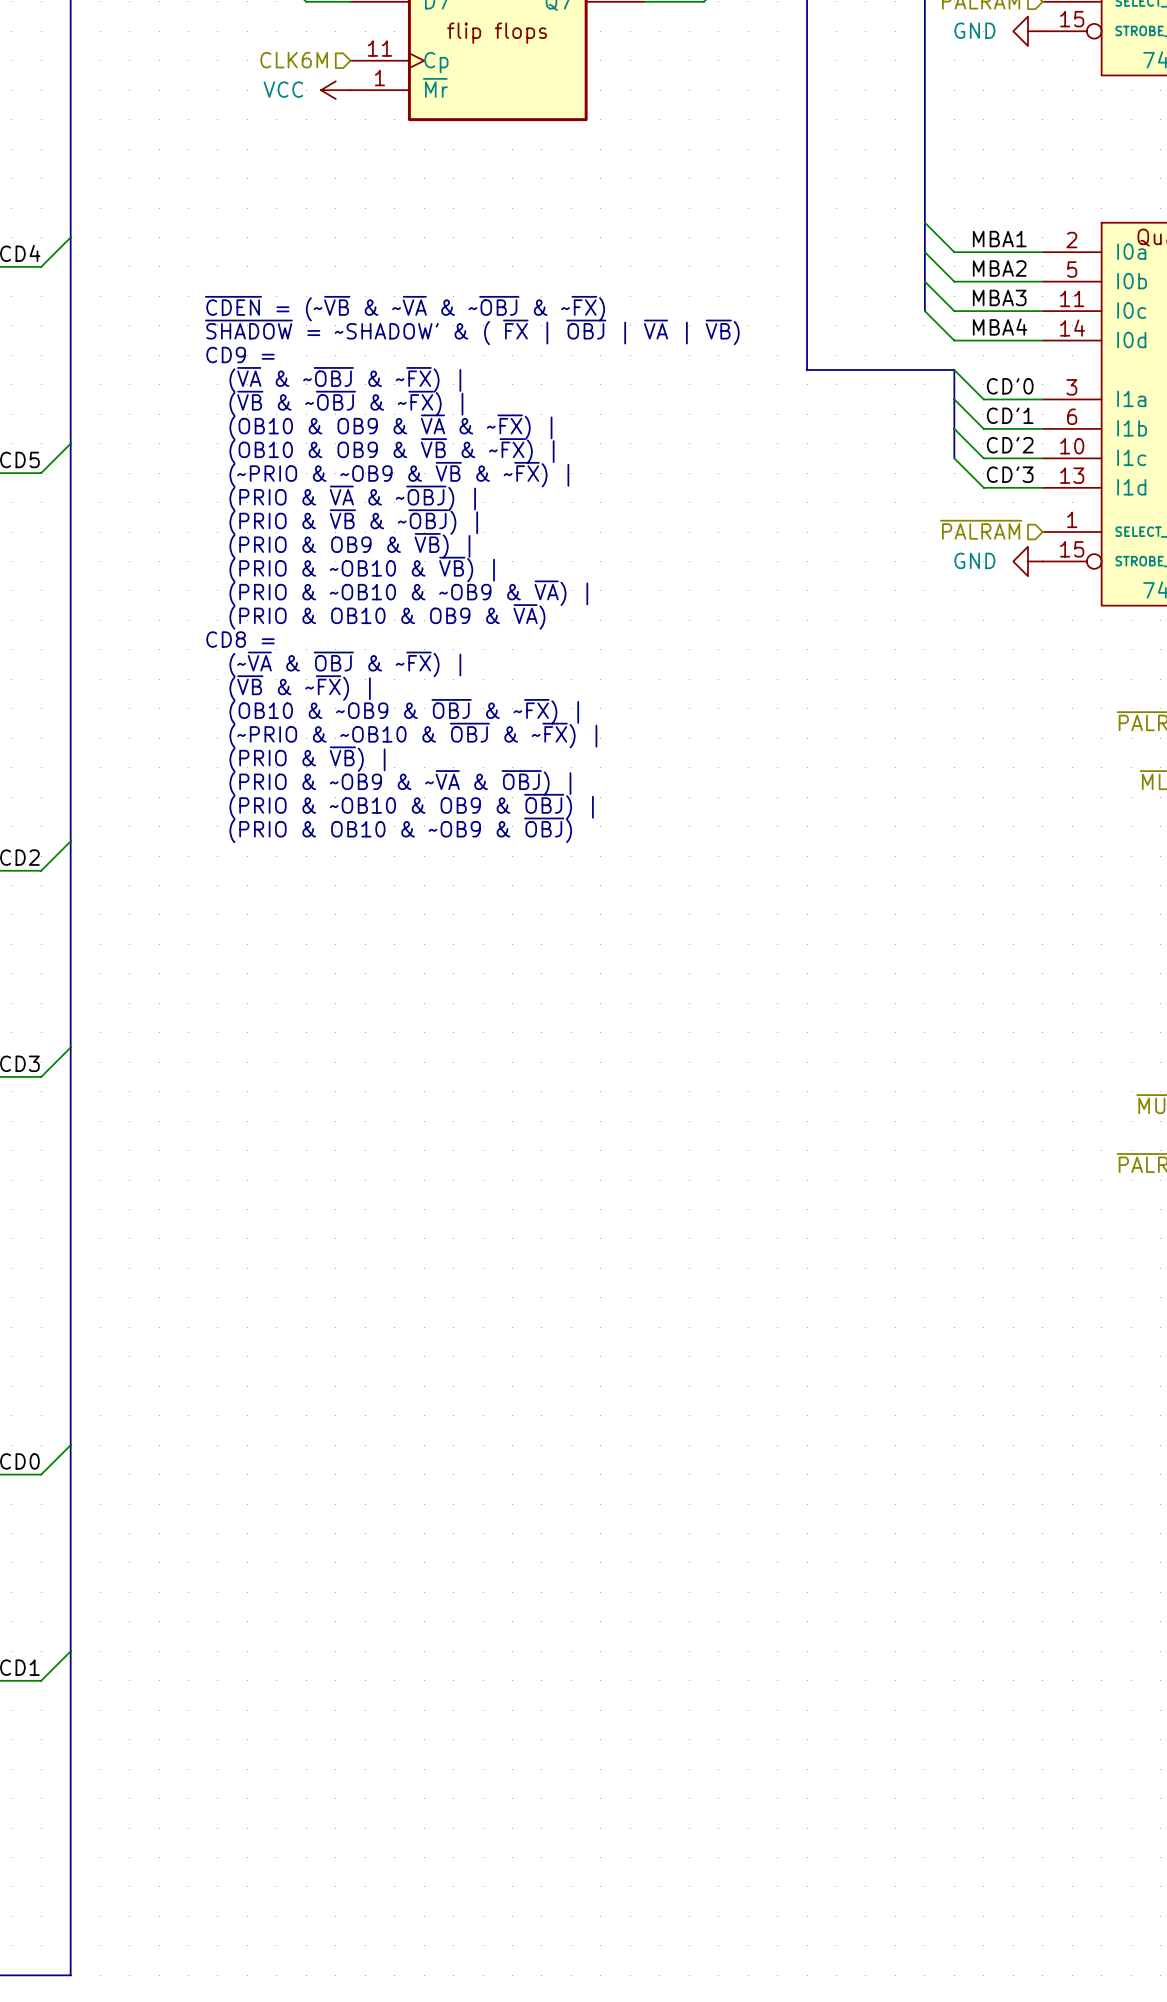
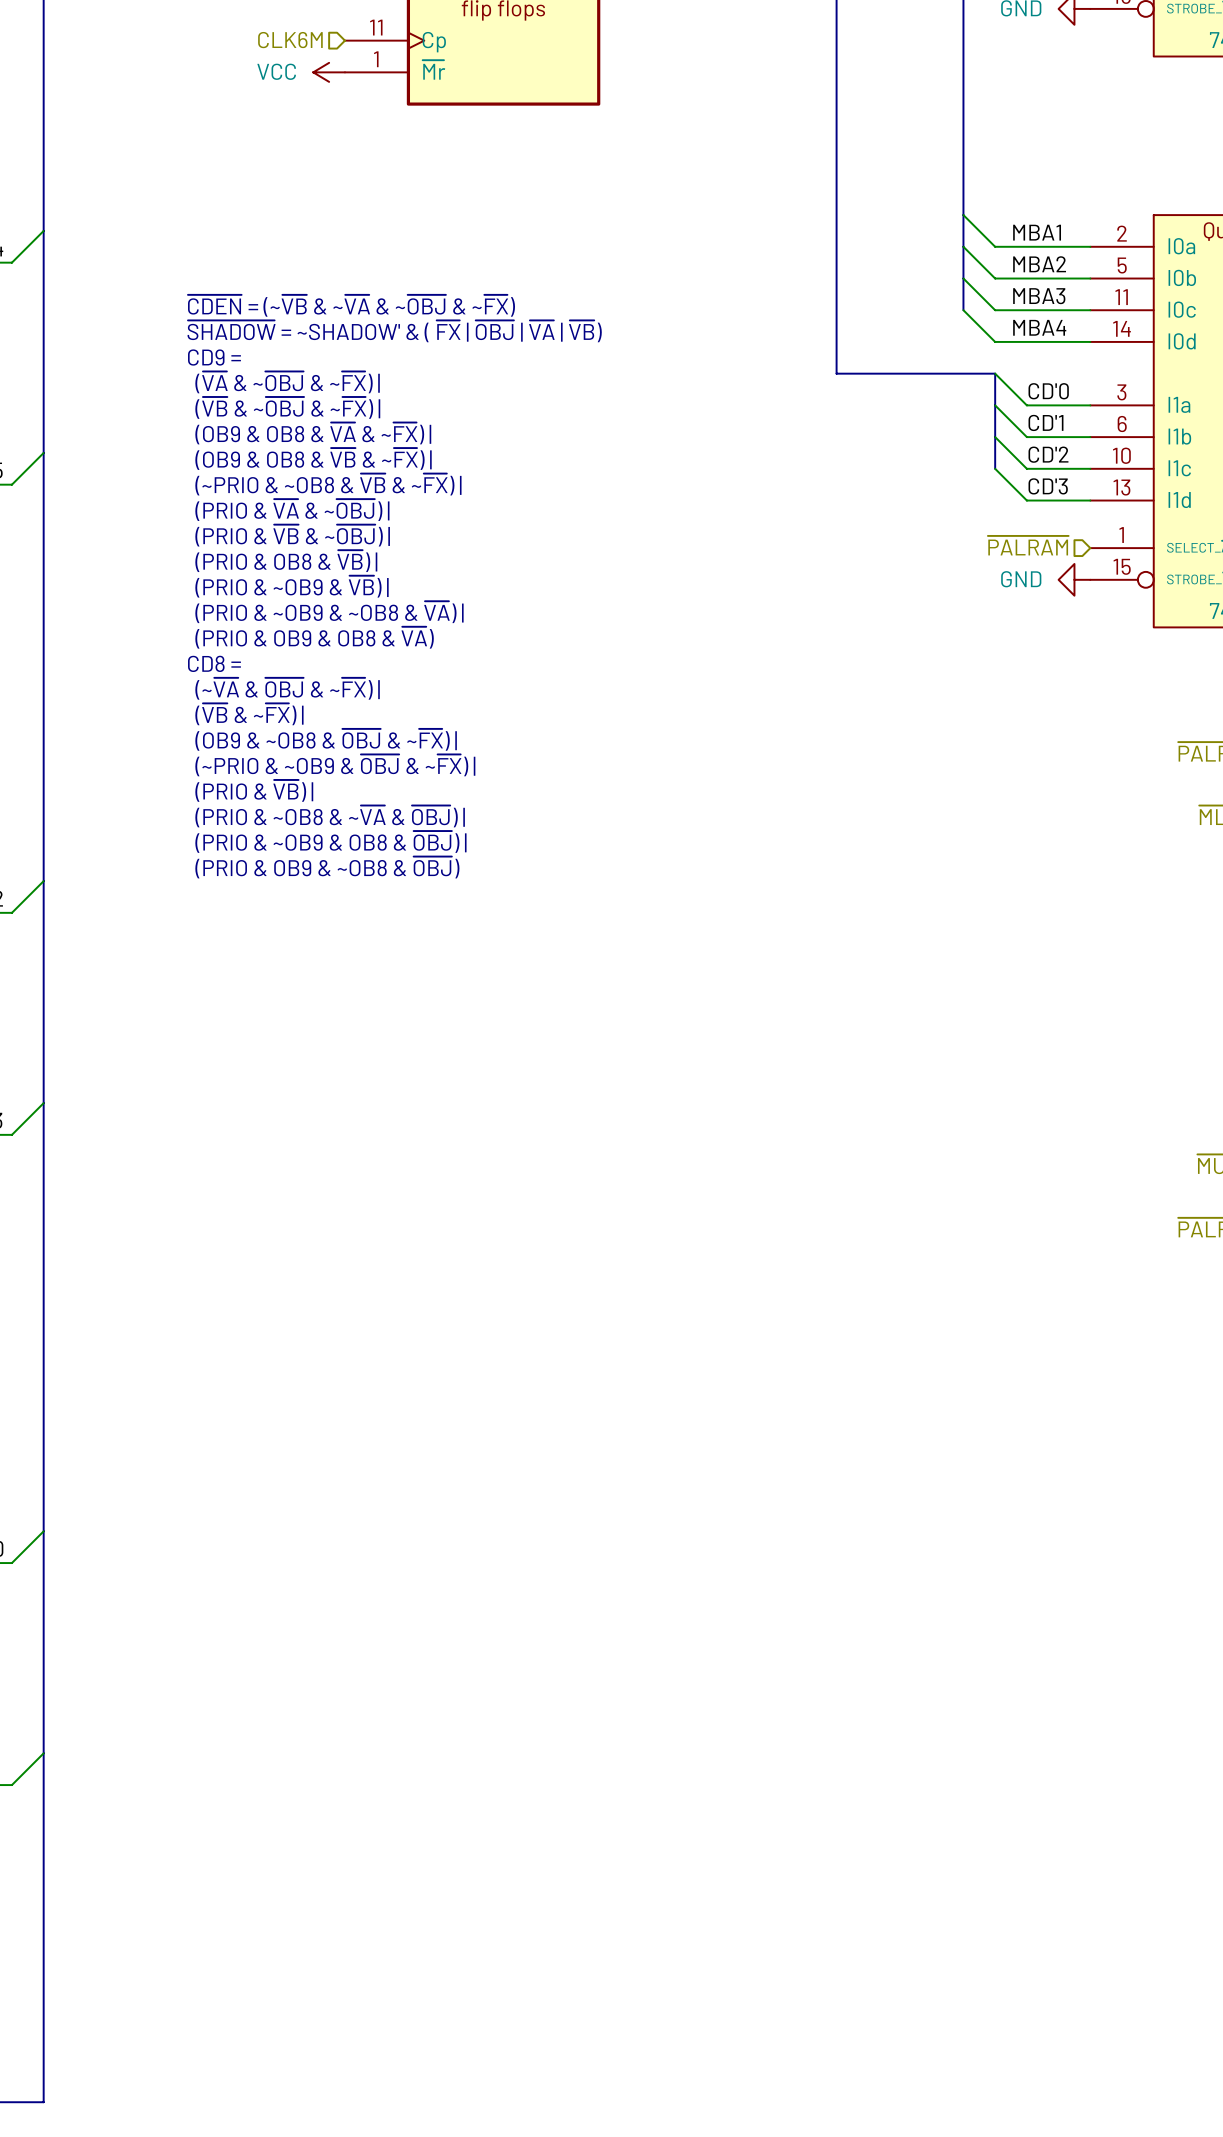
text: (OB10 & OB9 & ~{VA} & ~~{FX}) | (390, 427) -> (OB9 & OB8 & ~{VA} & ~~{FX}) | (313, 433)
text: (OB10 & OB9 & ~{VB} & ~~{FX}) | (391, 450) -> (OB9 & OB8 & ~{VB} & ~~{FX}) | (313, 458)
text: (~PRIO & ~OB9 & ~{VB} & ~~{FX}) | (399, 474) -> (~PRIO & ~OB8 & ~{VB} & ~~{FX}) | (328, 484)
text: (PRIO & OB9 & ~{VB}) | (349, 545) -> (PRIO & OB8 & ~{VB}) | (286, 561)
text: (PRIO & ~OB10 & ~{VB}) | (362, 569) -> (PRIO & ~OB9 & ~{VB}) | (292, 586)
text: (PRIO & ~OB10 & ~OB9 & ~{VA}) | (408, 593) -> (PRIO & ~OB9 & ~OB8 & ~{VA}) | (329, 612)
text: (PRIO & OB10 & OB9 & ~{VA}) (387, 616) -> (PRIO & OB9 & OB8 & ~{VA}) (314, 637)
text: (OB10 & ~OB9 & ~{OBJ} & ~~{FX}) | (404, 711) -> (OB9 & ~OB8 & ~{OBJ} & ~~{FX}) | (326, 739)
text: (~PRIO & ~OB10 & ~{OBJ} & ~~{FX}) | (413, 735) -> (~PRIO & ~OB9 & ~{OBJ} & ~~{FX}) | (335, 765)
text: (PRIO & ~OB9 & ~~{VA} & ~{OBJ}) | (400, 782) -> (PRIO & ~OB8 & ~~{VA} & ~{OBJ}) | (330, 816)
text: (PRIO & ~OB10 & OB9 & ~{OBJ}) | (411, 806) -> (PRIO & ~OB9 & OB8 & ~{OBJ}) | (330, 841)
text: (PRIO & OB10 & ~OB9 & ~{OBJ}) (400, 830) -> (PRIO & OB9 & ~OB8 & ~{OBJ}) (327, 867)

